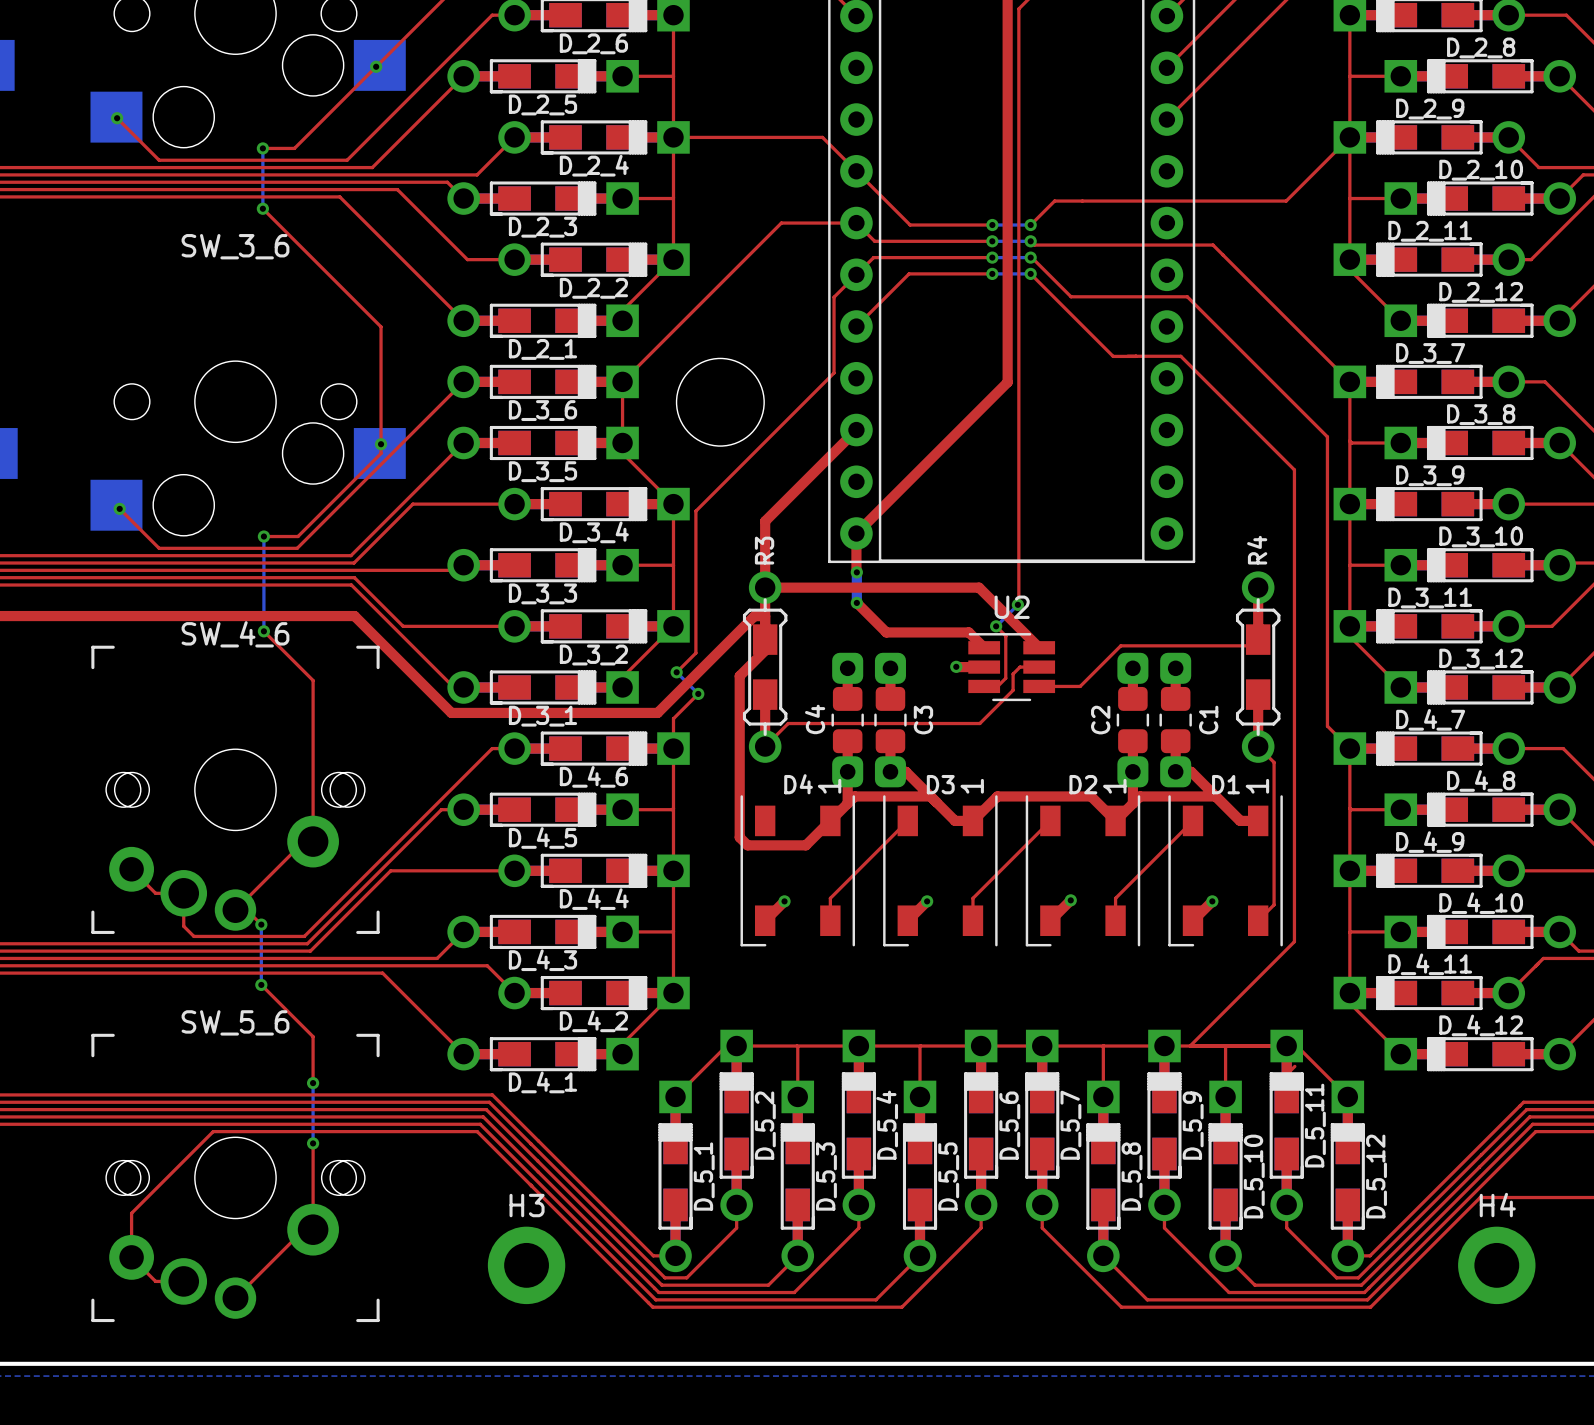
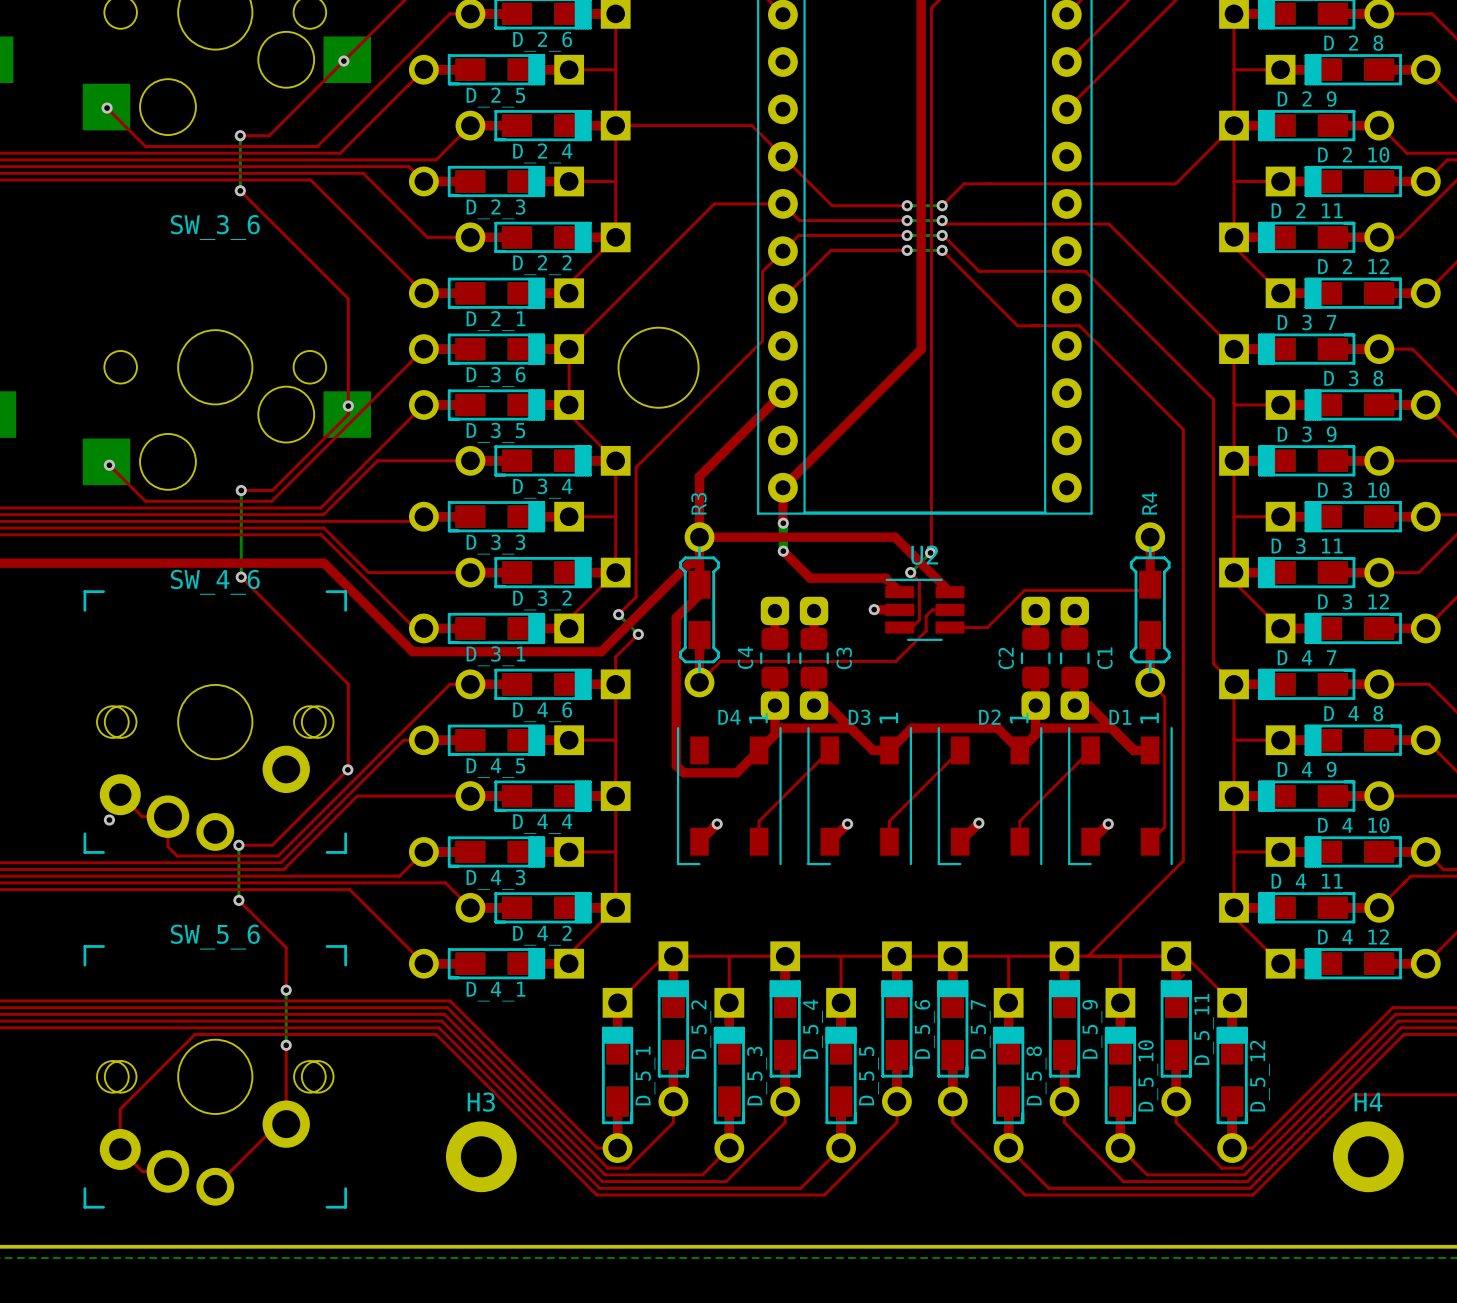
top track: (313, 680) (313, 841) (303, 841) (235, 910) (246, 910) (261, 924) -> (286, 622) (348, 684) (348, 769) (272, 845) (238, 845)
via: none -> (347, 769)
via: none -> (109, 820)

